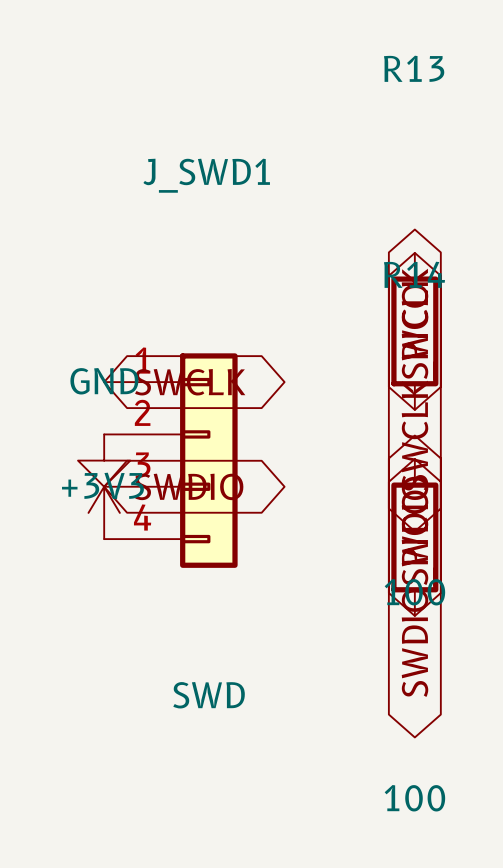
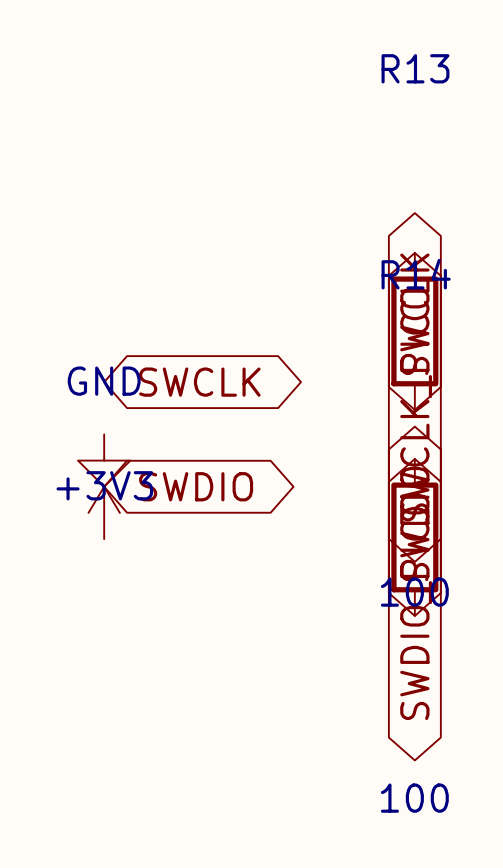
J_SWD1: SWD (170, 460) -> none

